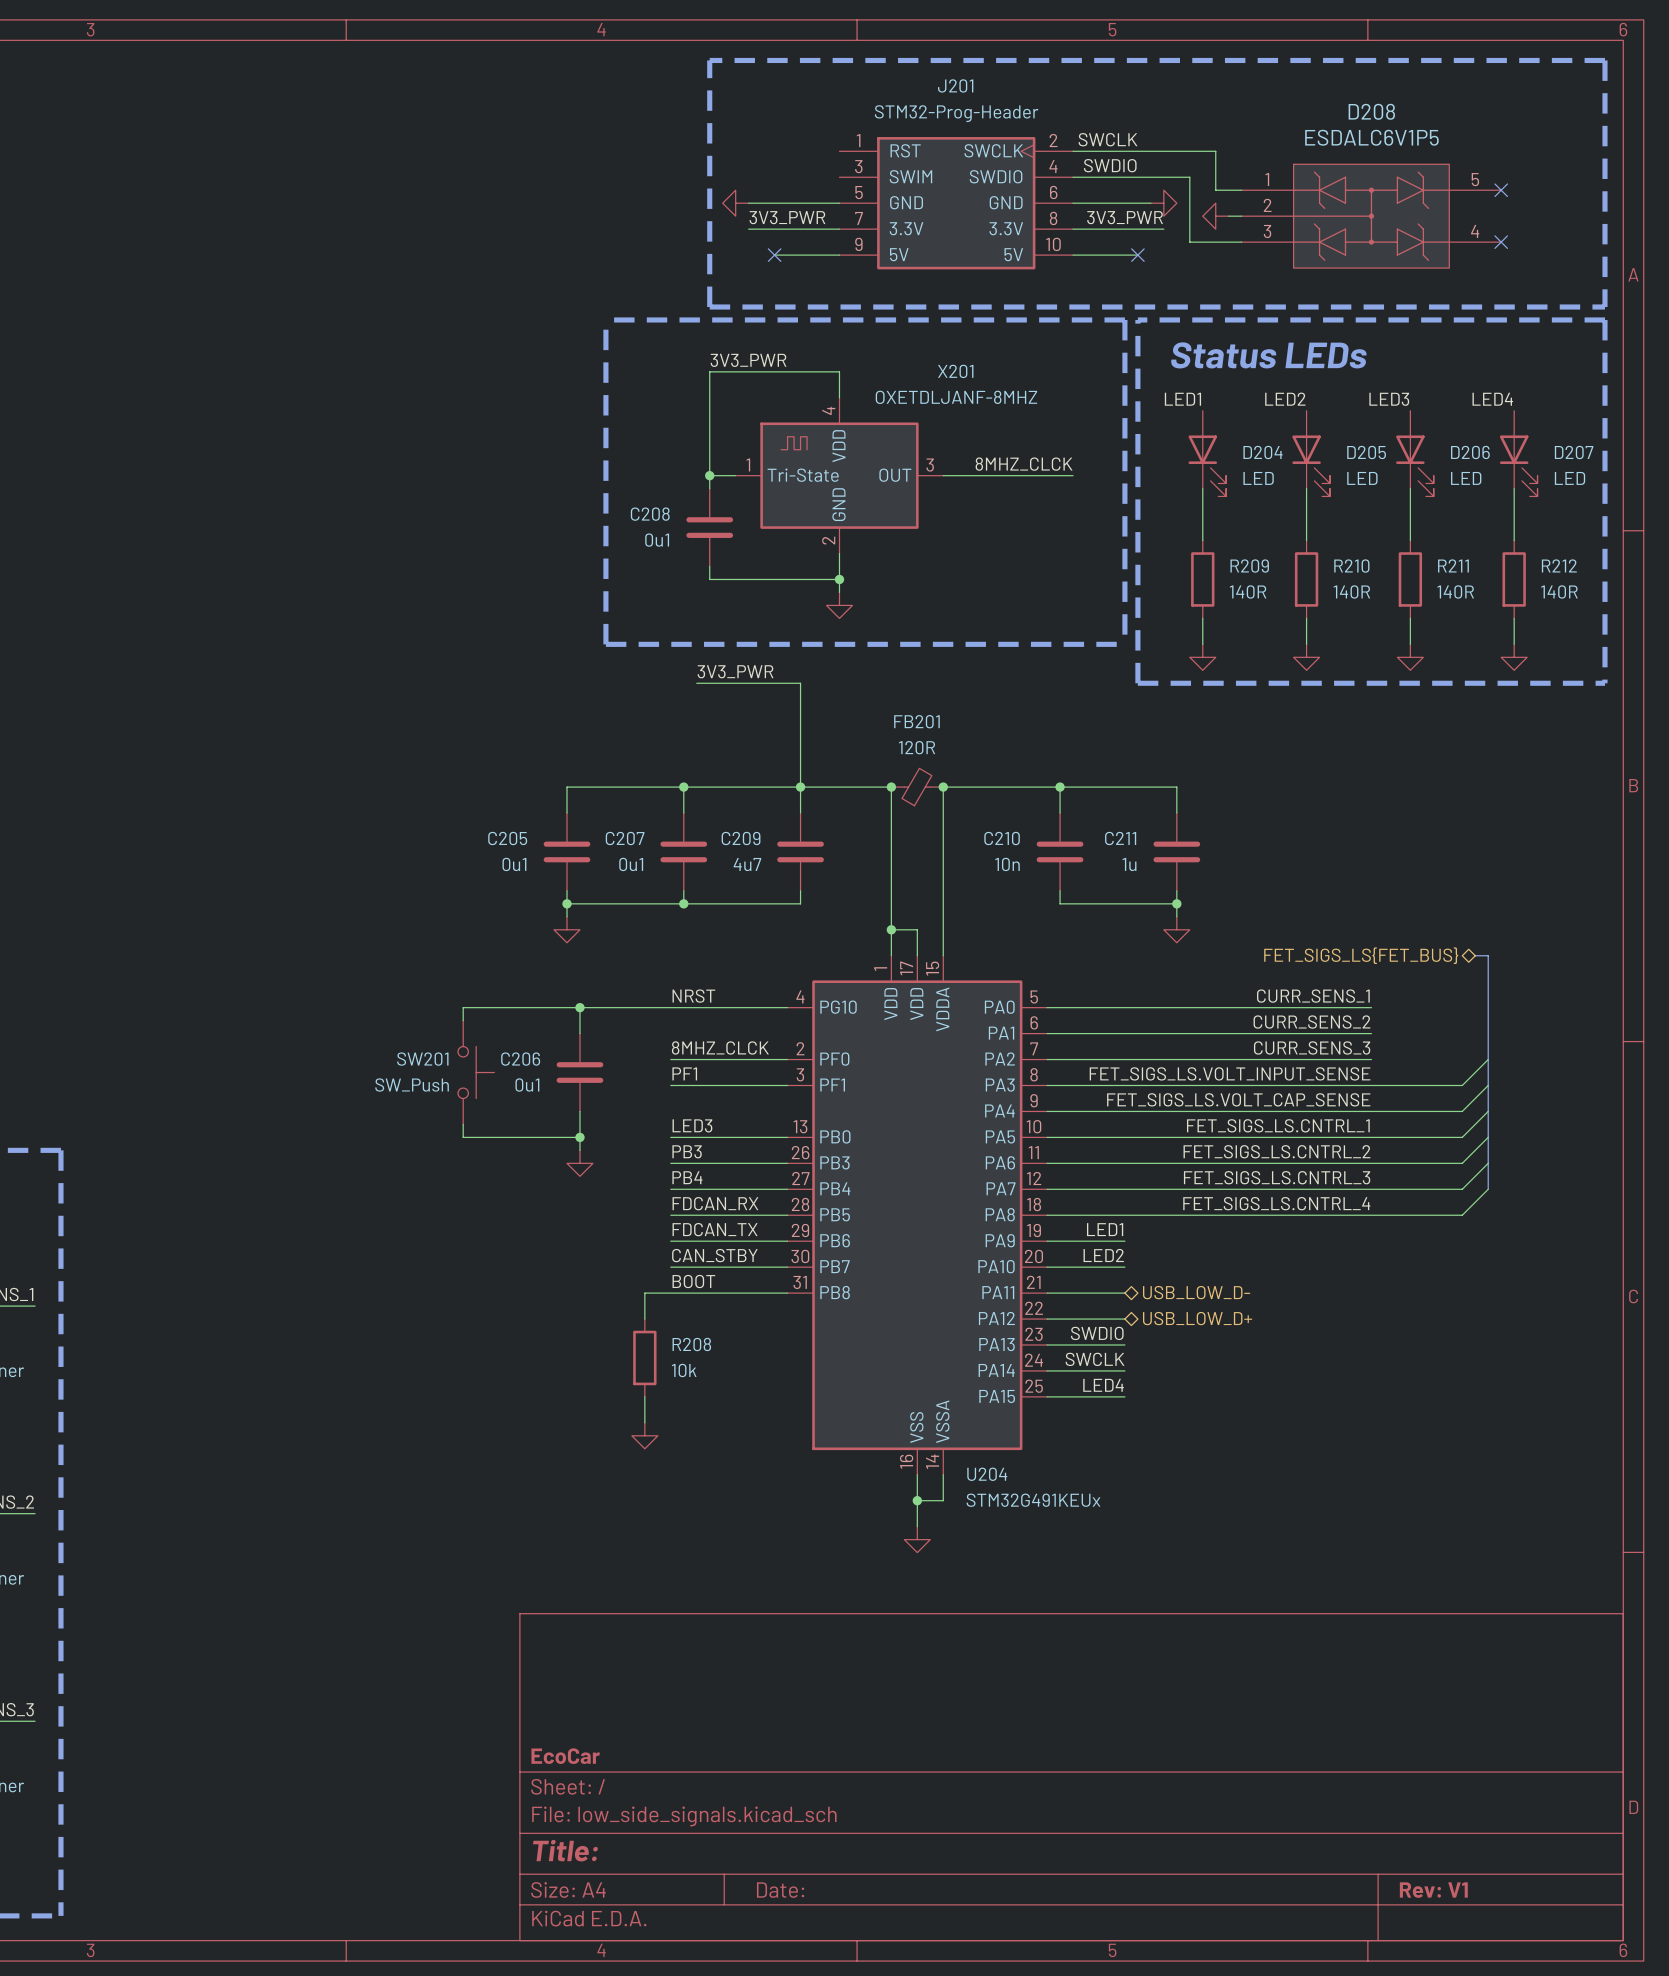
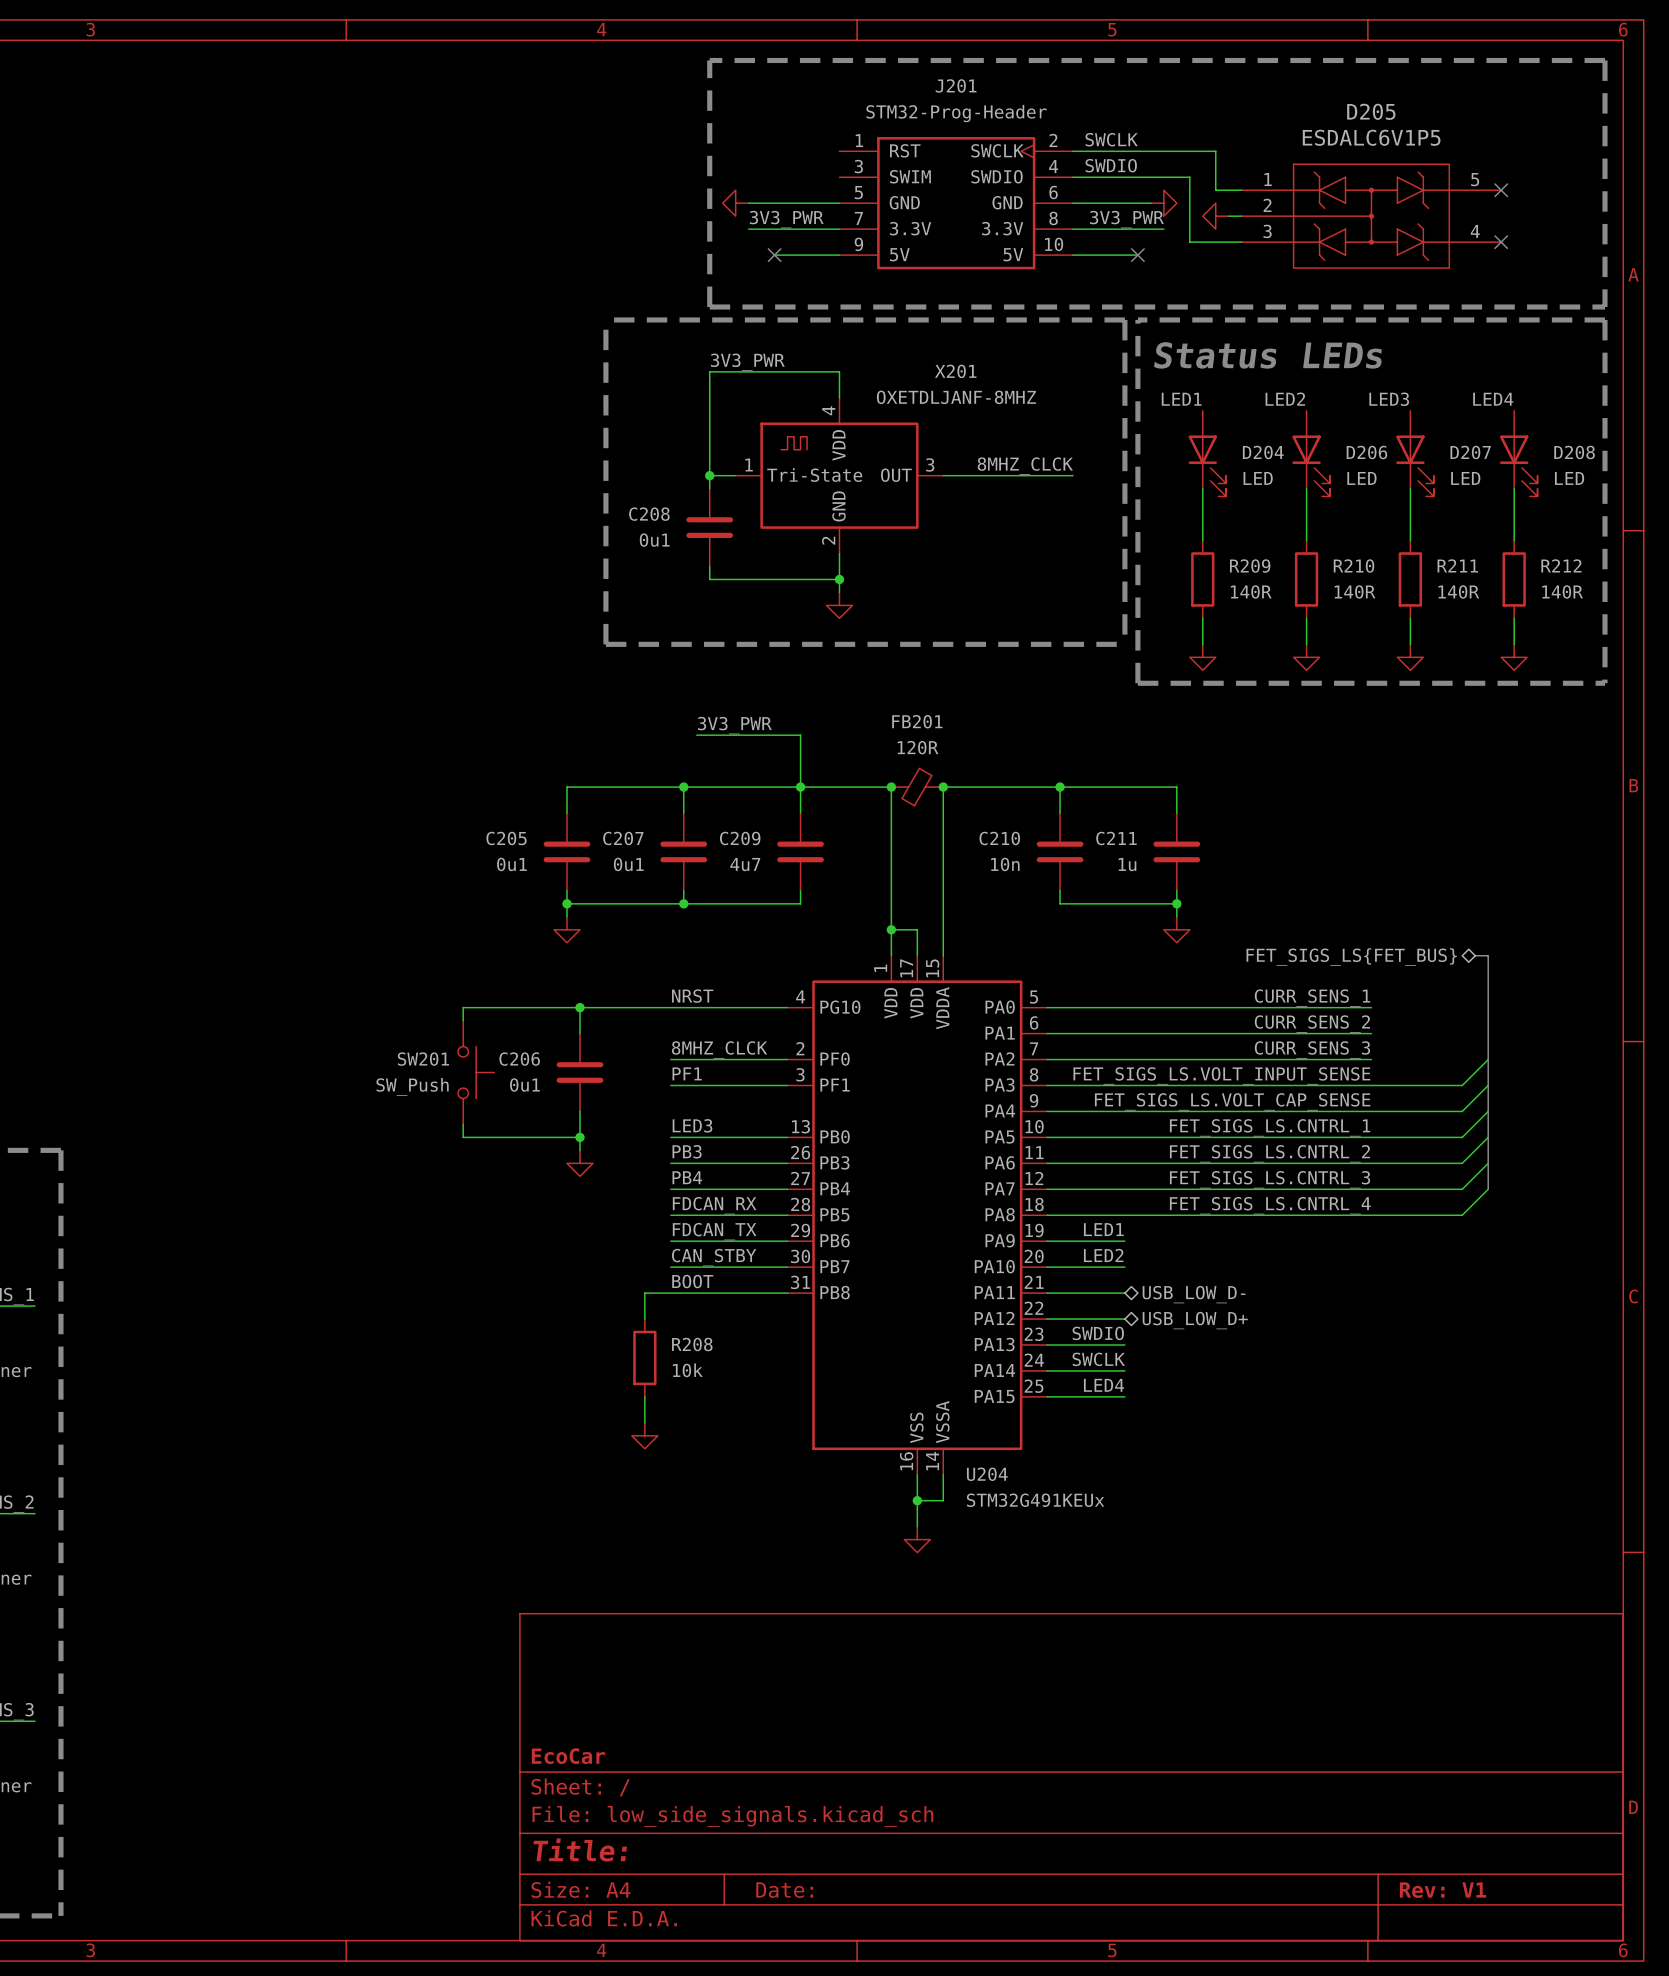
D208 name: D208 (1371, 111) -> D205 (1371, 111)
D205 name: D205 (1366, 452) -> D206 (1366, 452)
D206 name: D206 (1470, 452) -> D207 (1470, 452)
D207 name: D207 (1574, 452) -> D208 (1574, 452)
label position: 3V3_PWR (735, 671) -> 3V3_PWR (734, 725)
wire: (696, 683) (800, 683) (800, 735) -> (696, 735) (800, 735)

